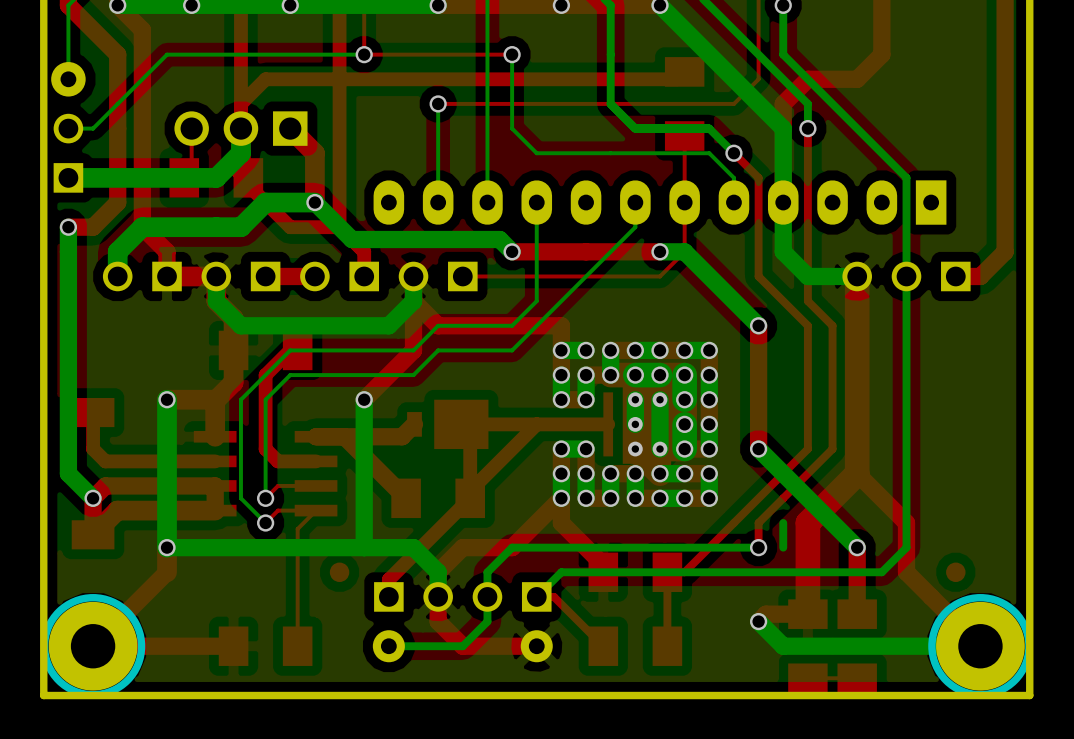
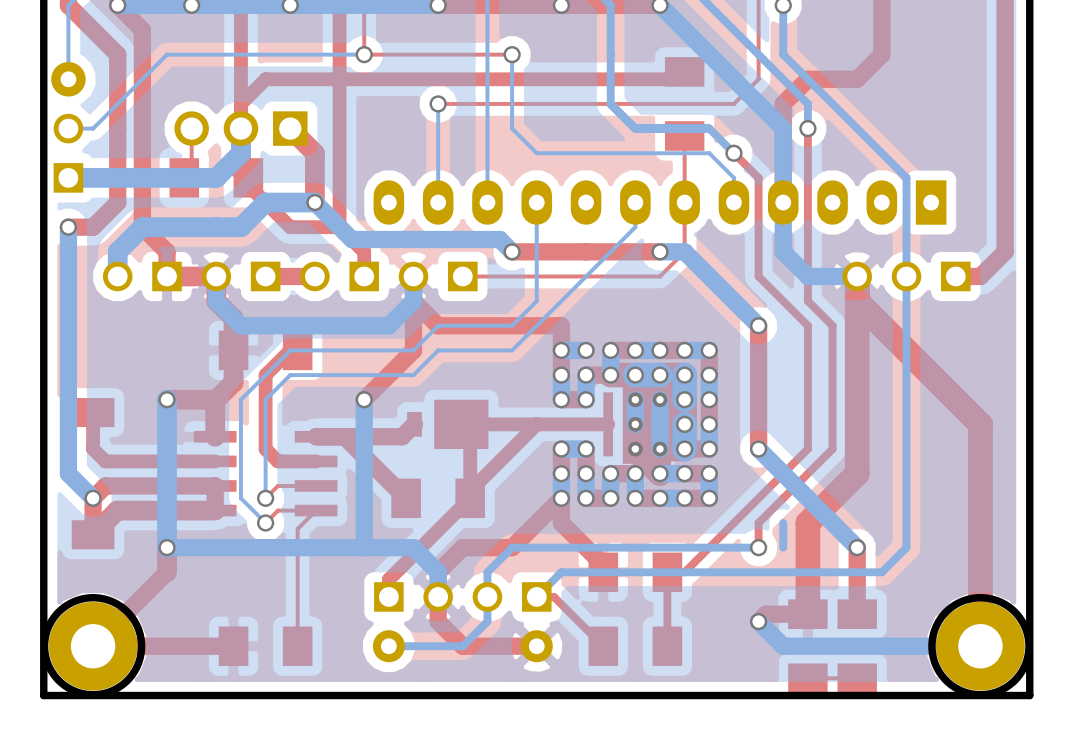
top track: (857, 473) (906, 522) (906, 572) (980, 646) -> (857, 301) (980, 424) (980, 646)
part: (339, 572) -> none
part: (955, 572) -> none

